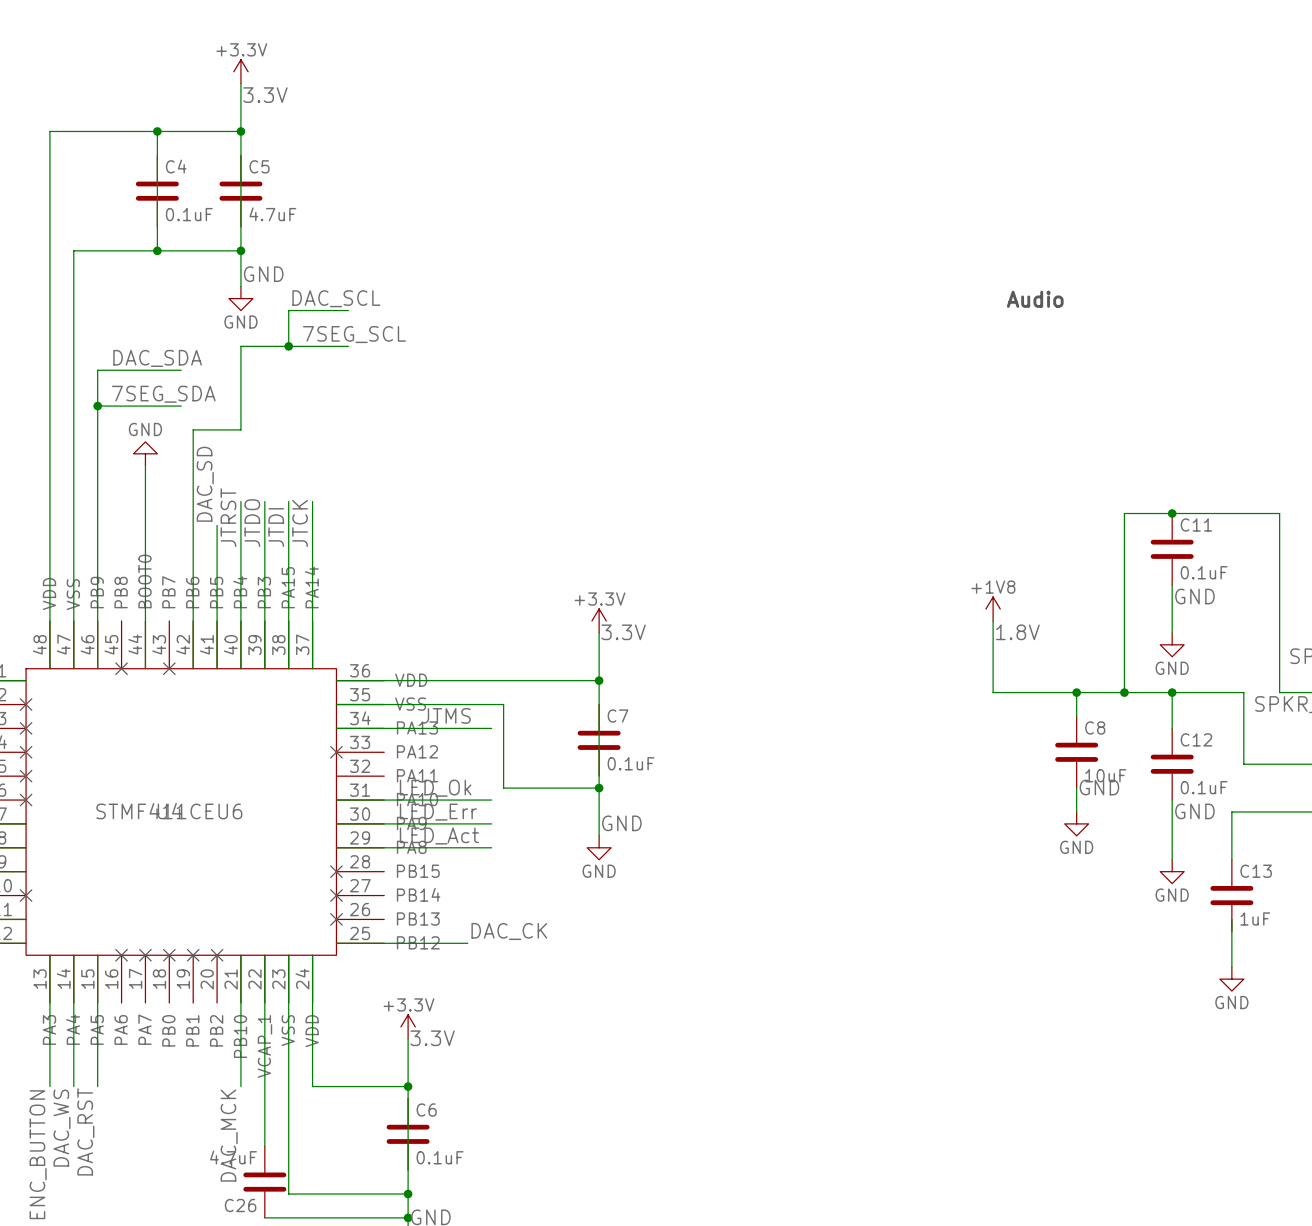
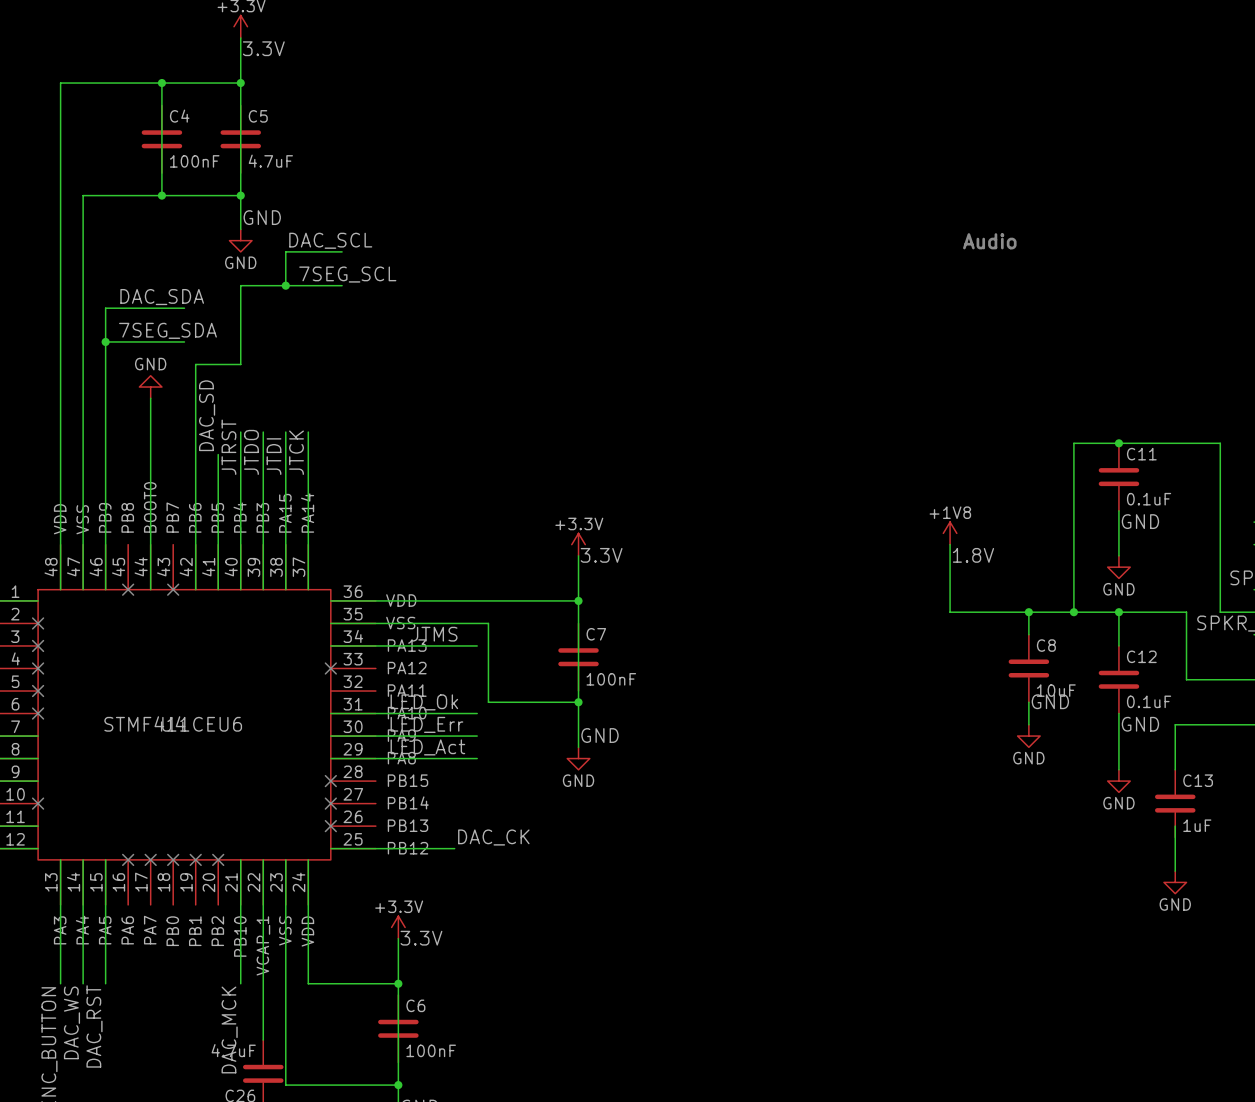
C4 value: 0.1uF (189, 214) -> 100nF (194, 161)
C7 value: 0.1uF (631, 763) -> 100nF (611, 679)
C6 value: 0.1uF (440, 1157) -> 100nF (431, 1050)

